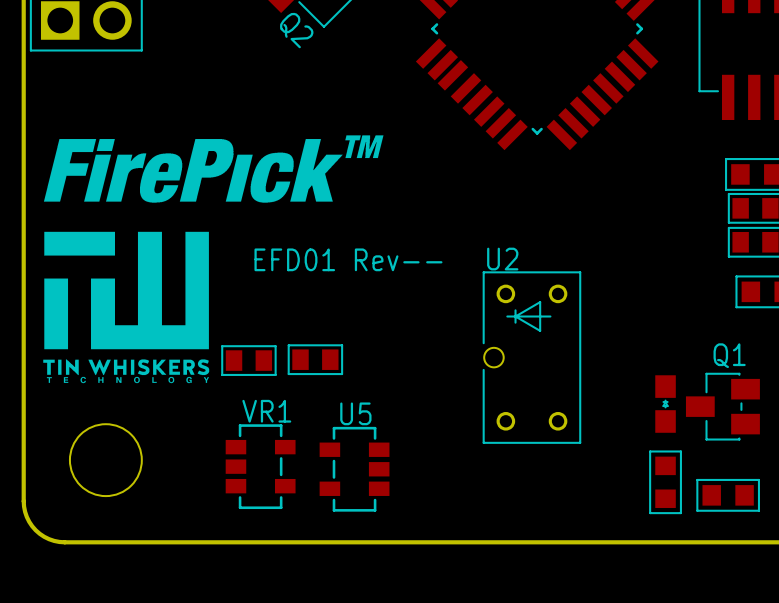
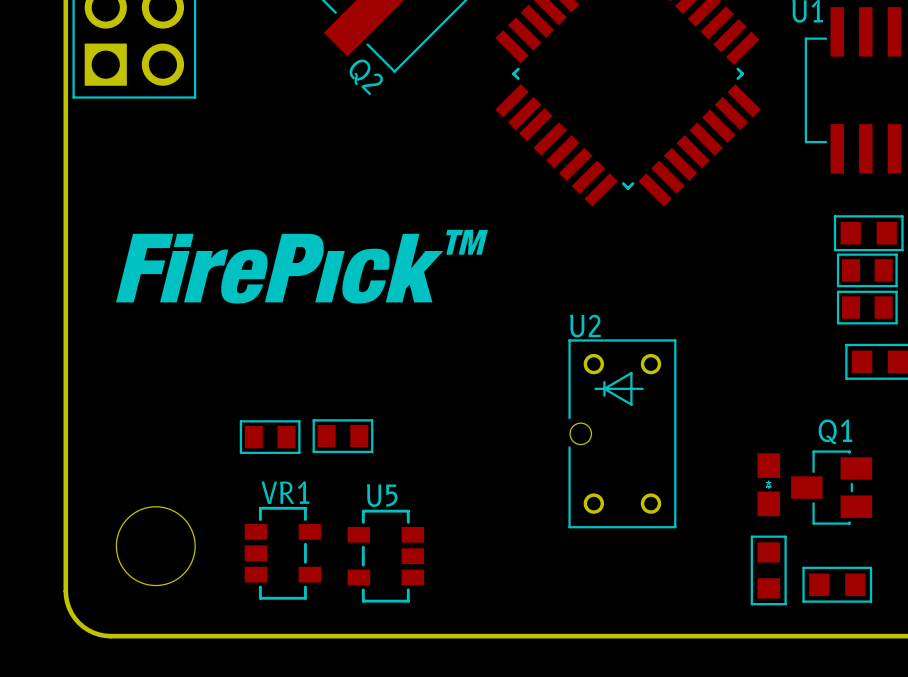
drawing position: (213, 169) -> (301, 266)
drawing: [43, 231, 210, 384] -> none
text: EFD01 Rev-- (348, 259) -> none
part: none -> (342, 436)
part: (315, 359) -> none
part: none -> (270, 437)
part: (248, 360) -> none
VR1 position: (260, 466) -> (282, 553)
U5 position: (354, 469) -> (385, 556)

